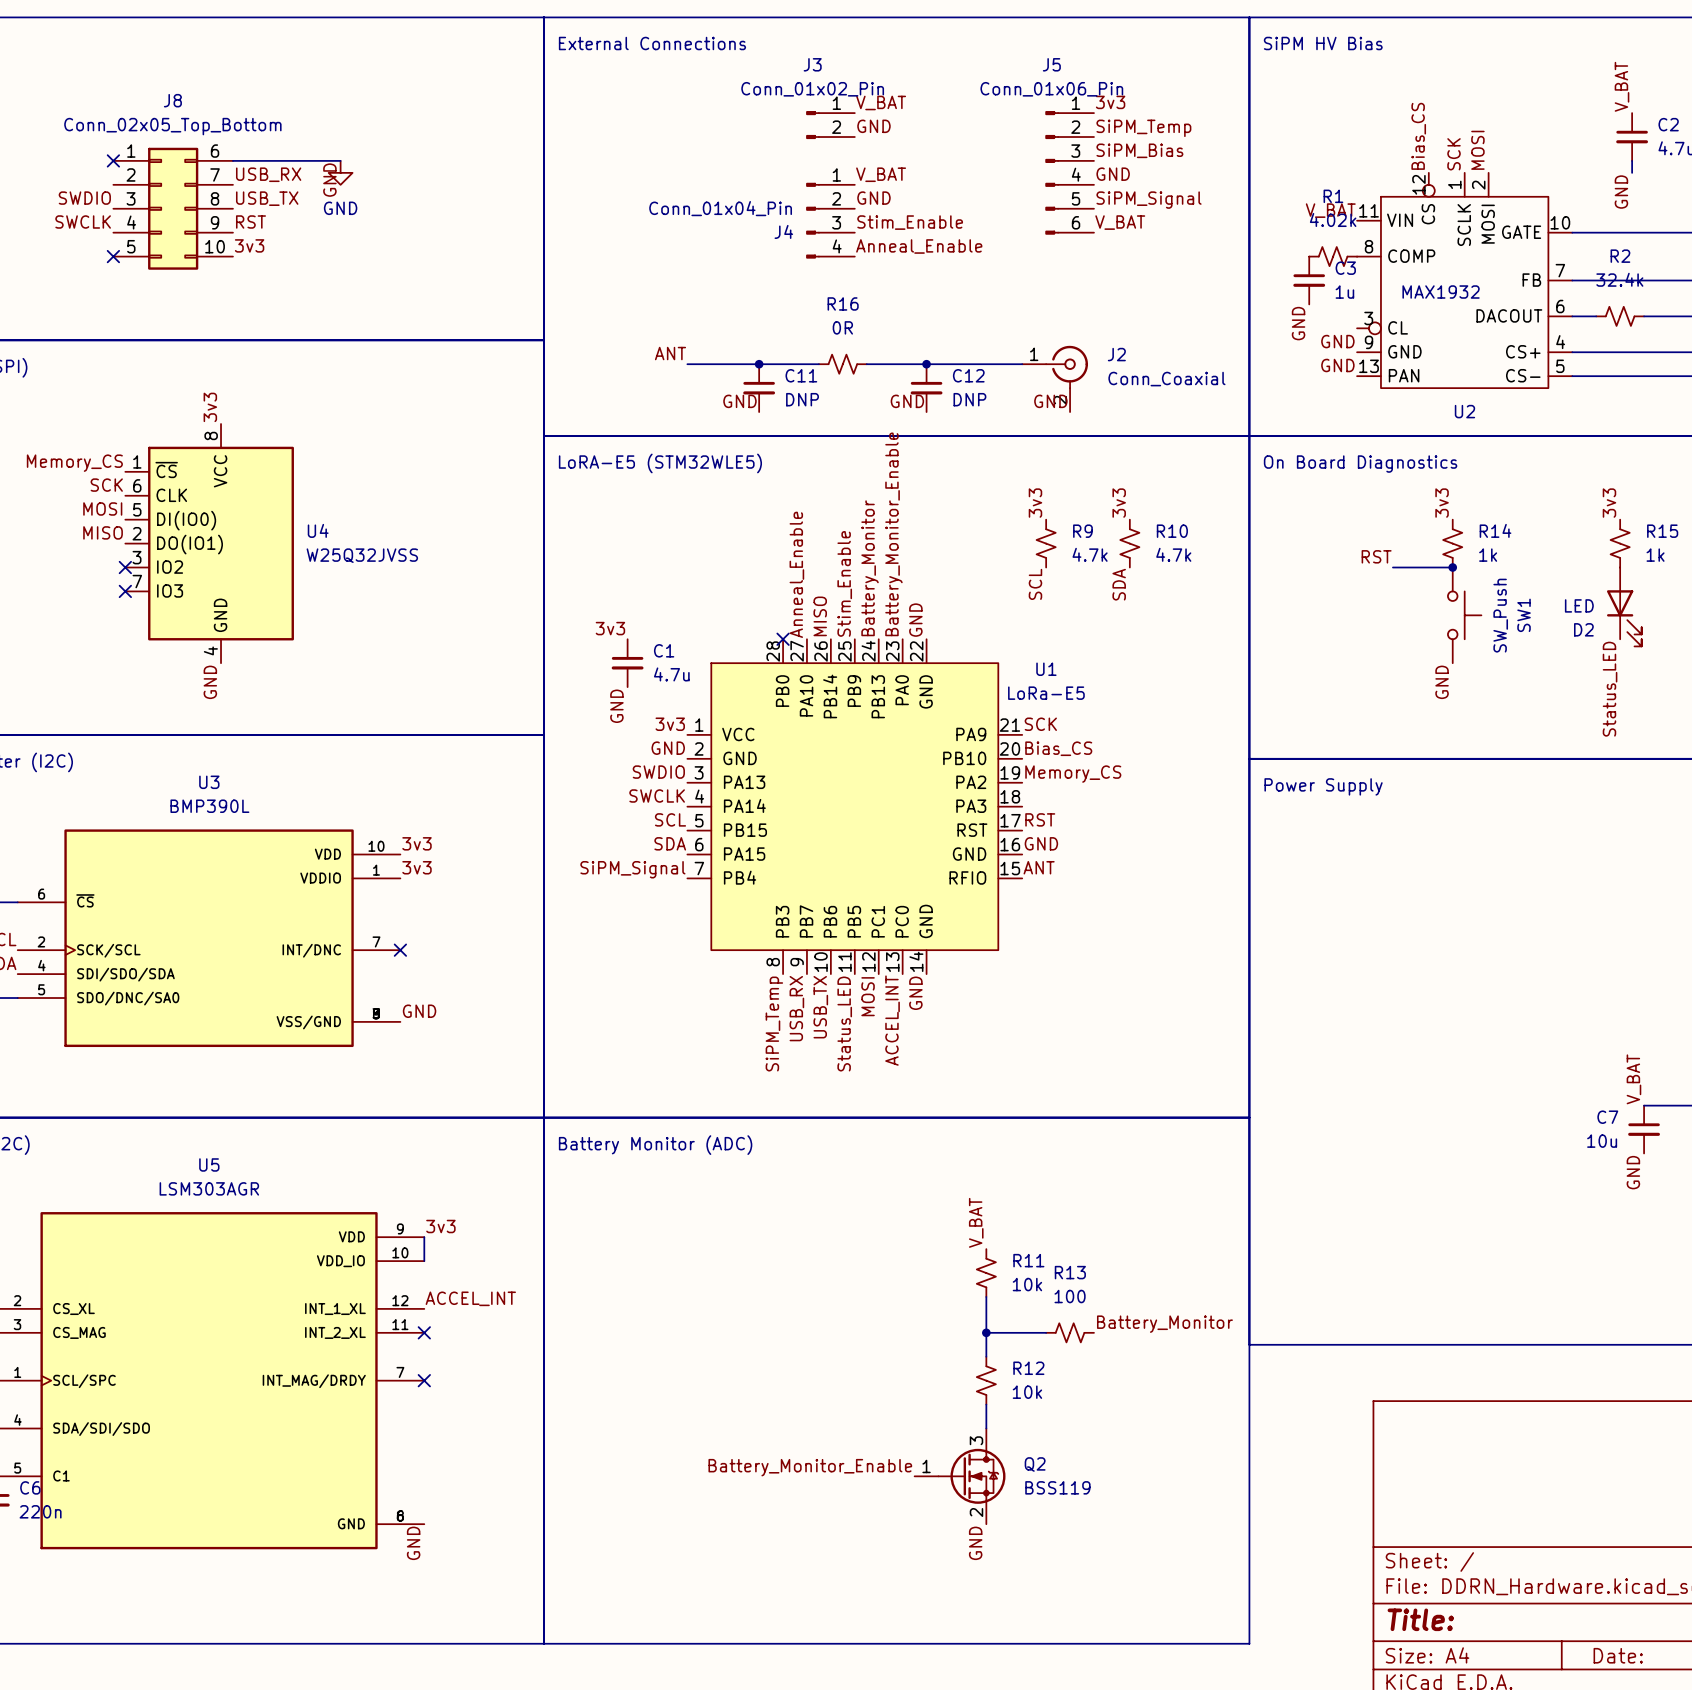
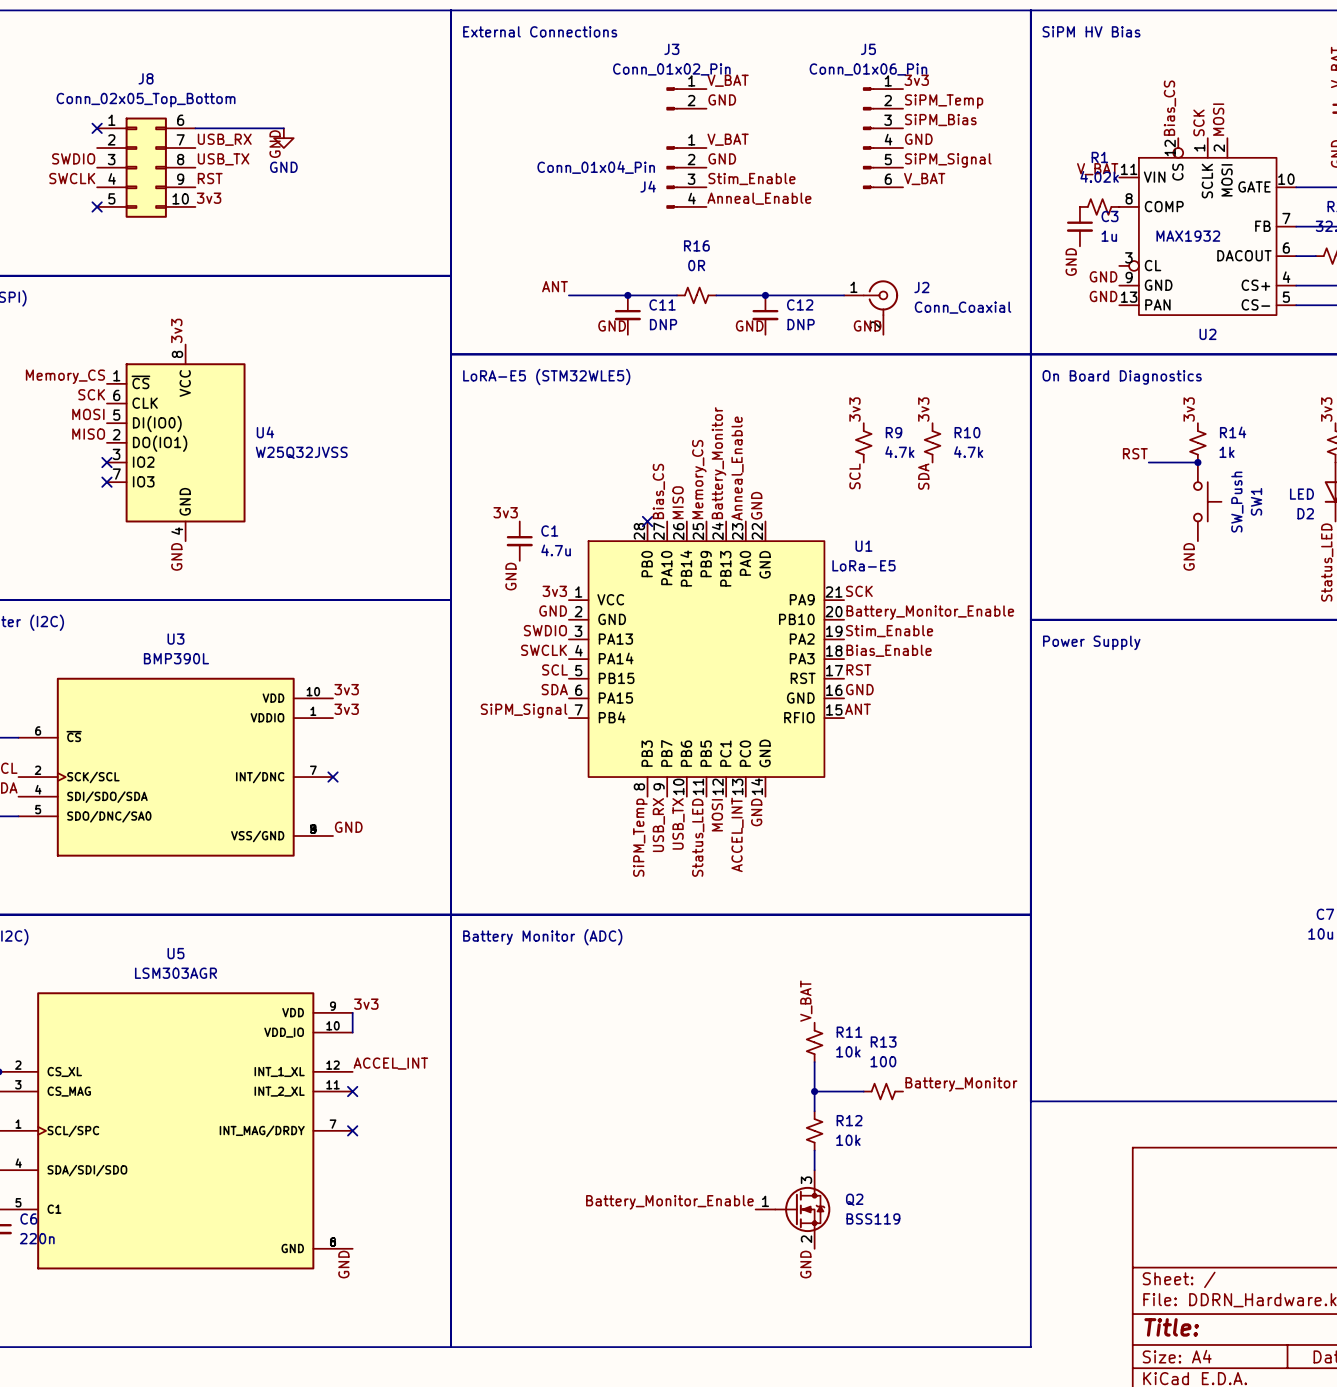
label: Battery_Monitor_Enable (893, 534) -> Anneal_Enable (737, 468)
label: Anneal_Enable (796, 574) -> Bias_CS (658, 491)
label: Stim_Enable (844, 583) -> Memory_CS (699, 479)
label: Bias_CS (1058, 748) -> Battery_Monitor_Enable (930, 612)
label: Memory_CS (1073, 774) -> Stim_Enable (889, 631)
label: none -> Bias_Enable (889, 650)

